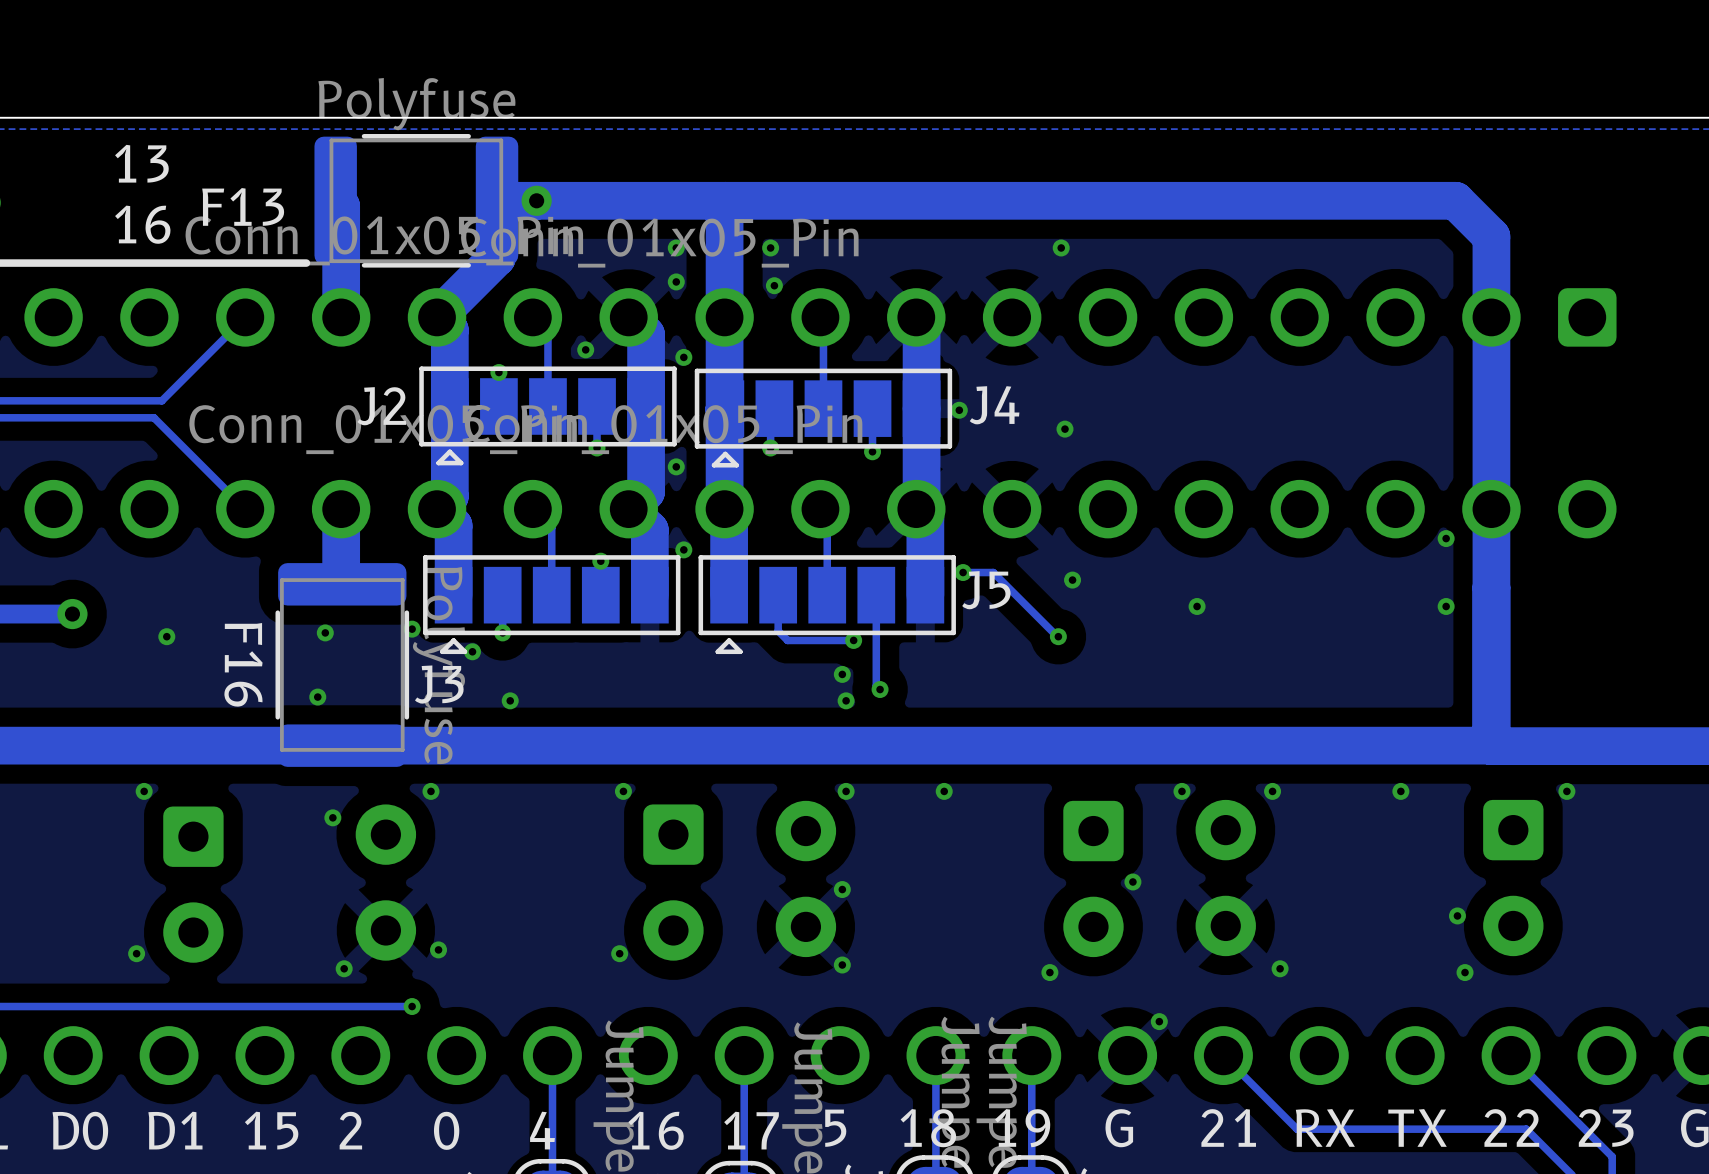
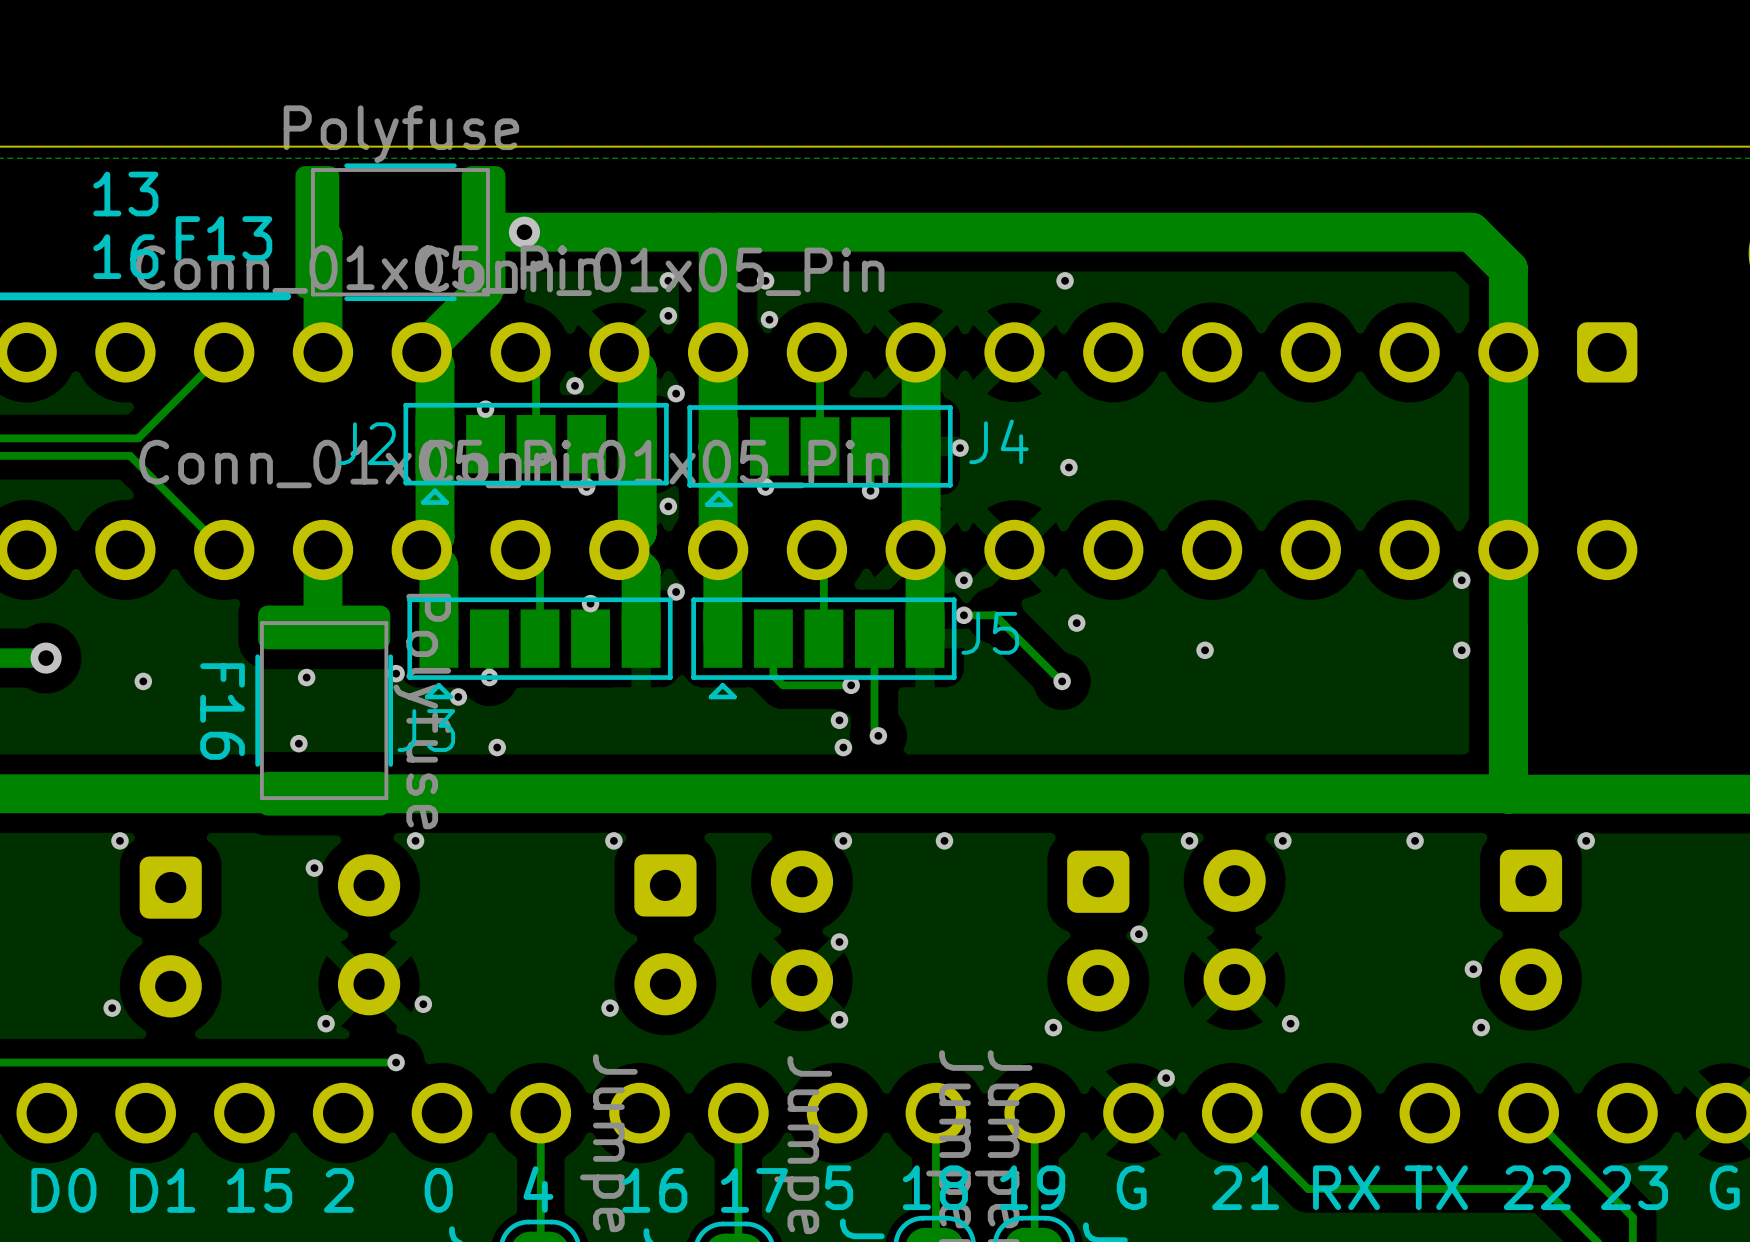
via: none -> (963, 580)

